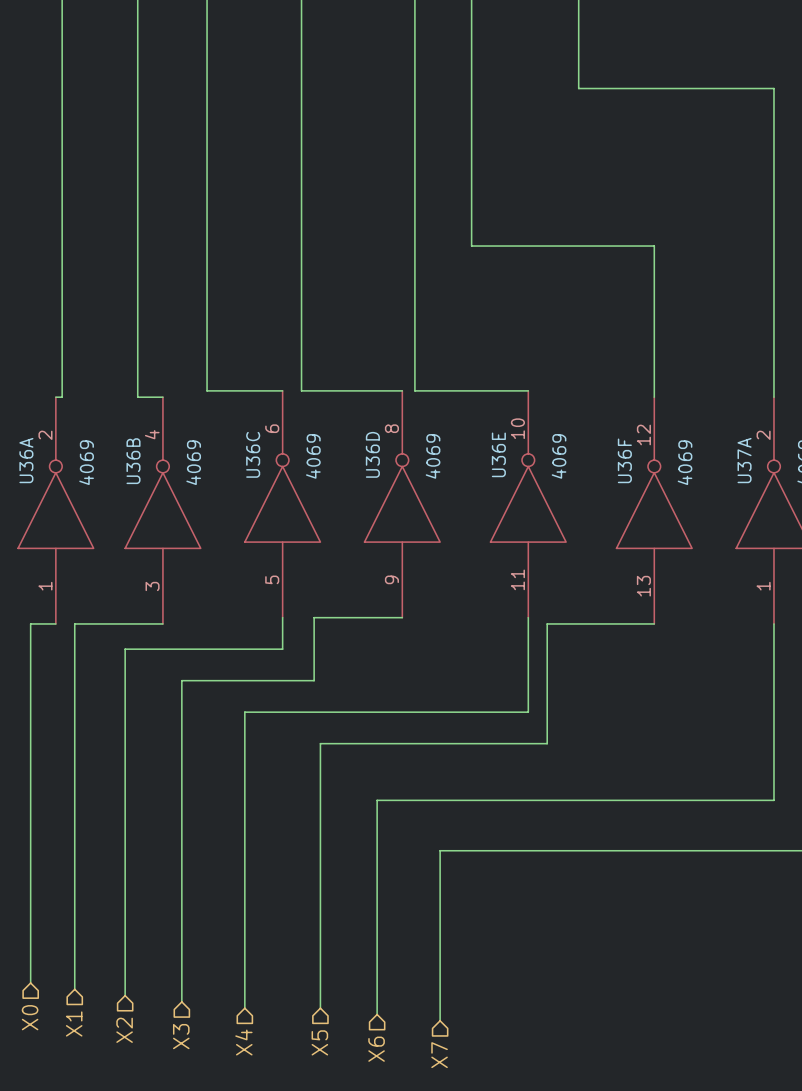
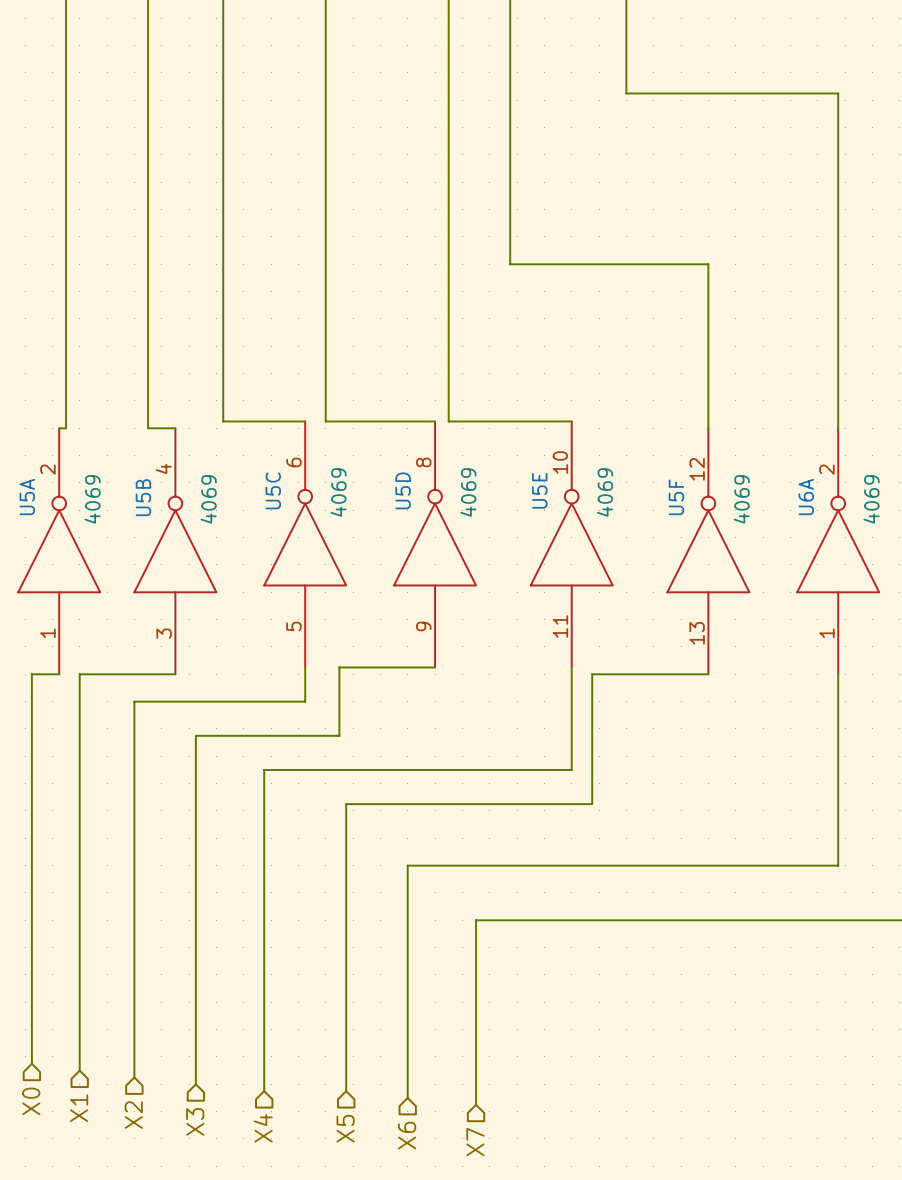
U36C name: U36C (253, 454) -> U5C (273, 490)
U36D name: U36D (372, 454) -> U5D (403, 490)
U36E name: U36E (498, 454) -> U5E (539, 490)
U36A name: U36A (26, 460) -> U5A (27, 497)
U36F name: U36F (624, 460) -> U5F (676, 497)
U37A name: U37A (744, 460) -> U6A (806, 497)
U36B name: U36B (133, 461) -> U5B (143, 497)

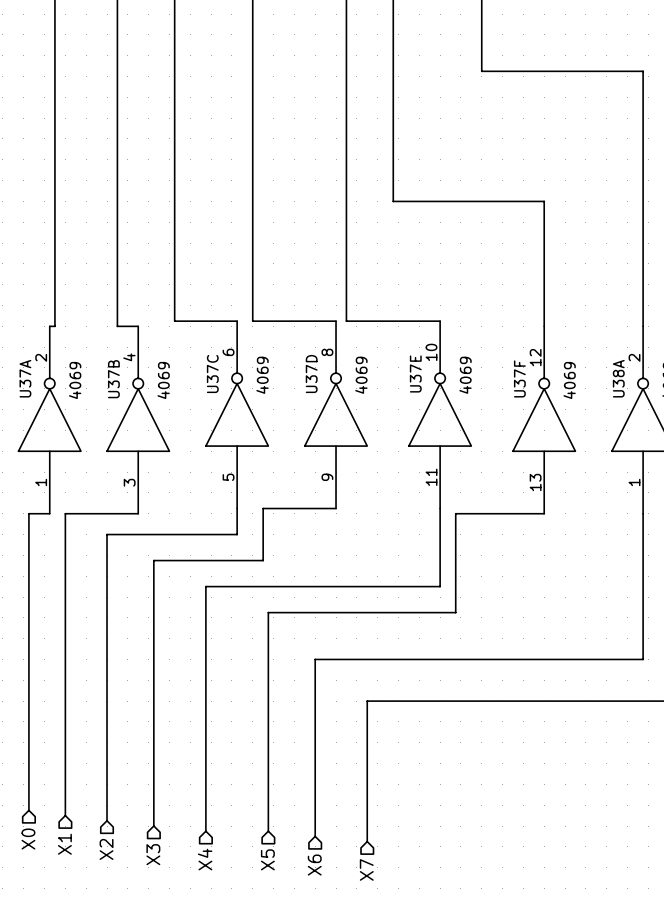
U5C name: U5C (273, 490) -> U37C (212, 373)
U5D name: U5D (403, 490) -> U37D (311, 373)
U5E name: U5E (539, 490) -> U37E (415, 373)
U5A name: U5A (27, 497) -> U37A (25, 378)
U5B name: U5B (143, 497) -> U37B (113, 379)
U5F name: U5F (676, 497) -> U37F (519, 378)
U6A name: U6A (806, 497) -> U38A (618, 378)

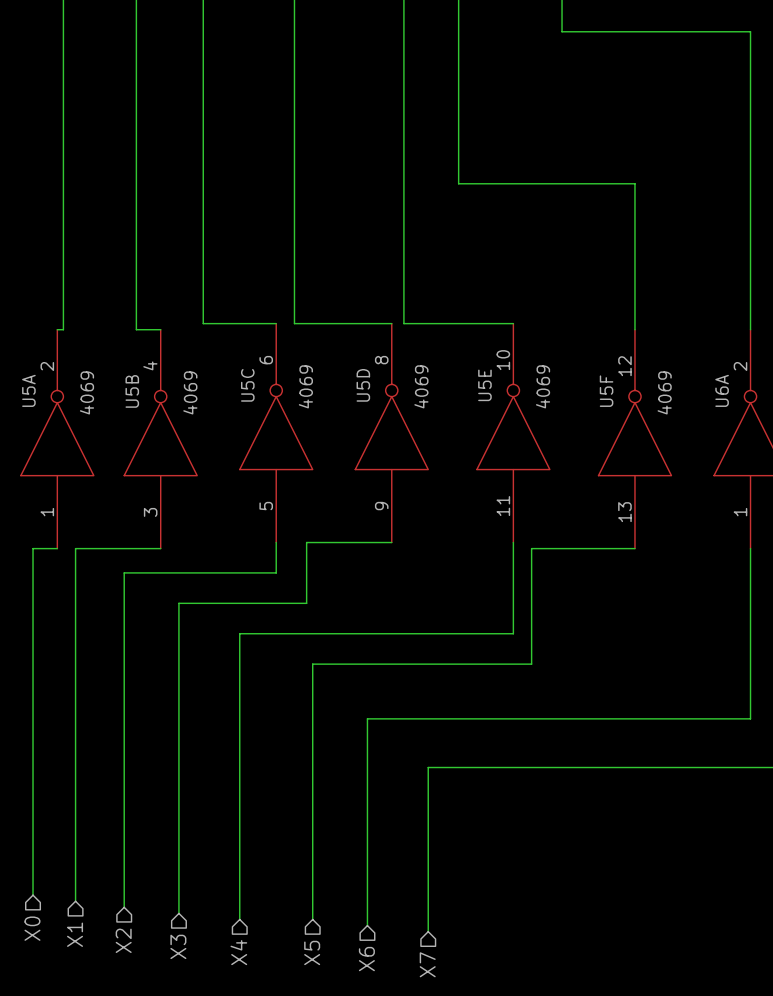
U37C name: U37C (212, 373) -> U5C (247, 385)
U37D name: U37D (311, 373) -> U5D (363, 385)
U37E name: U37E (415, 373) -> U5E (484, 385)
U37A name: U37A (25, 378) -> U5A (28, 390)
U37F name: U37F (519, 378) -> U5F (606, 391)
U38A name: U38A (618, 378) -> U6A (722, 390)
U37B name: U37B (113, 379) -> U5B (132, 391)

